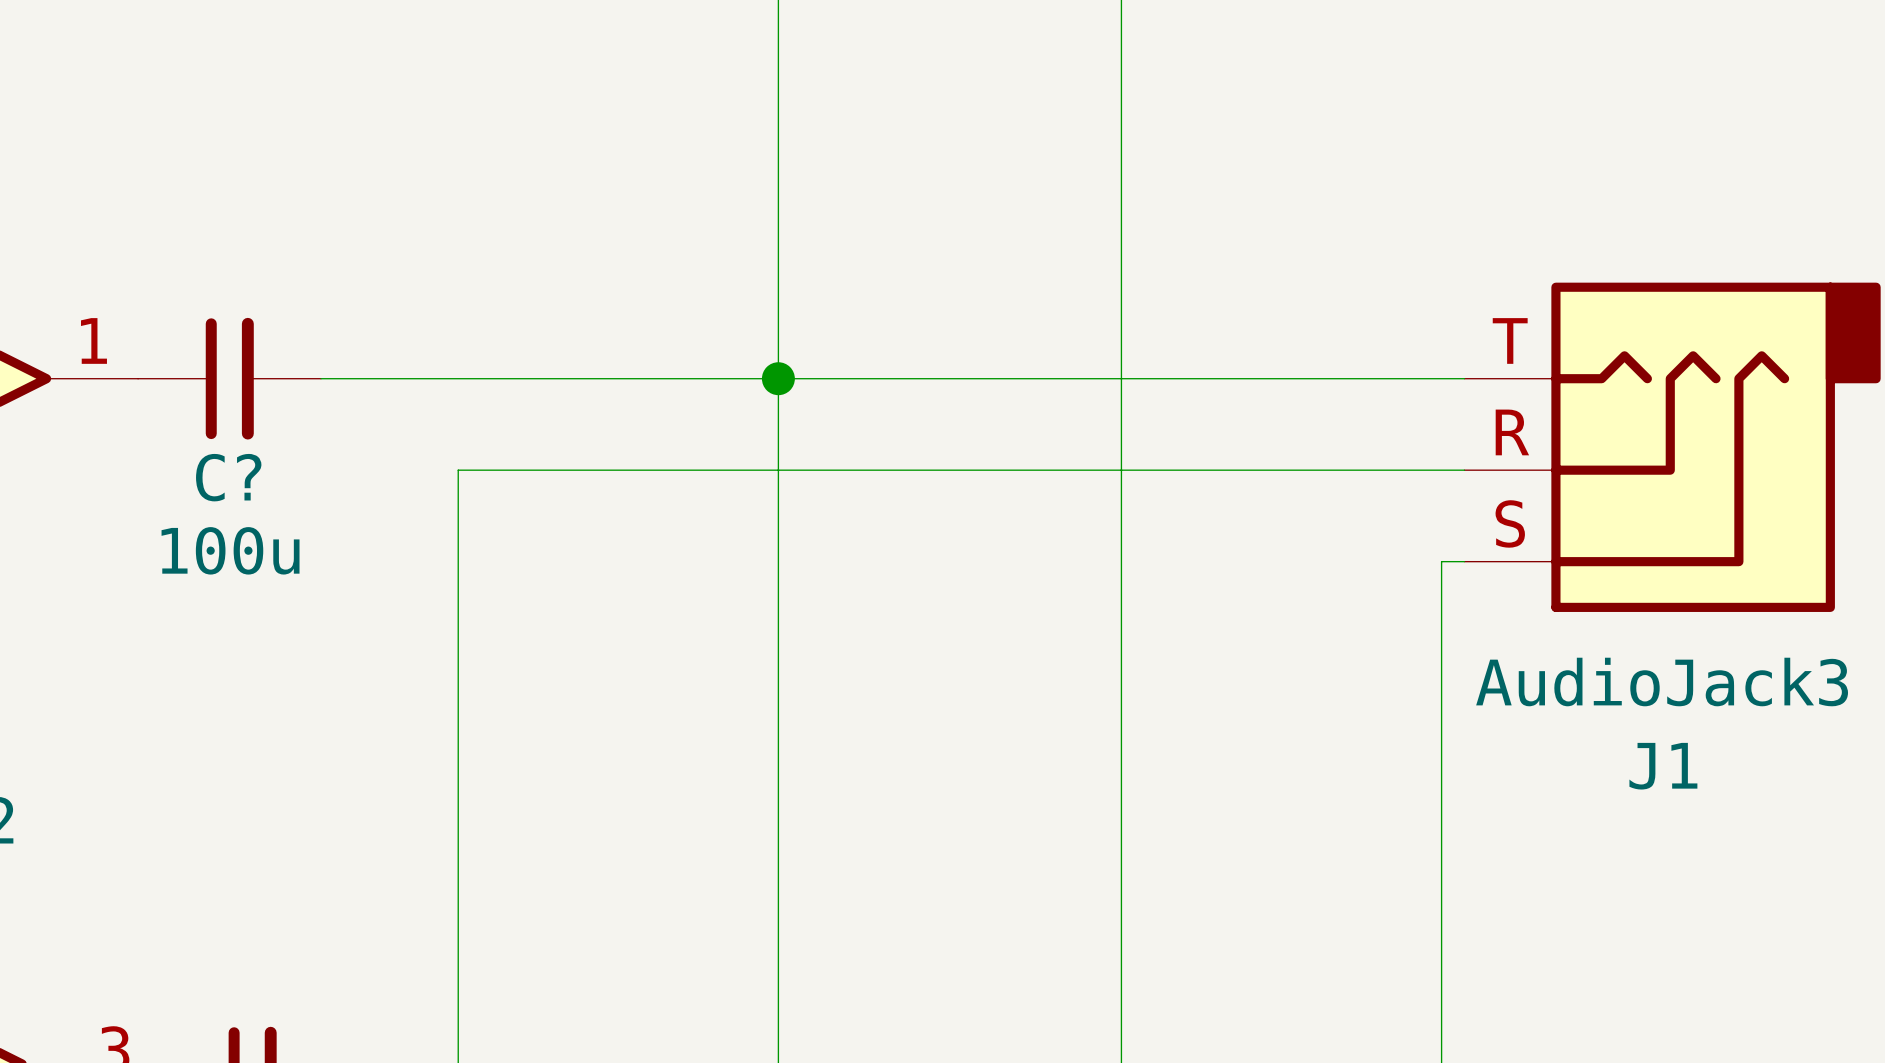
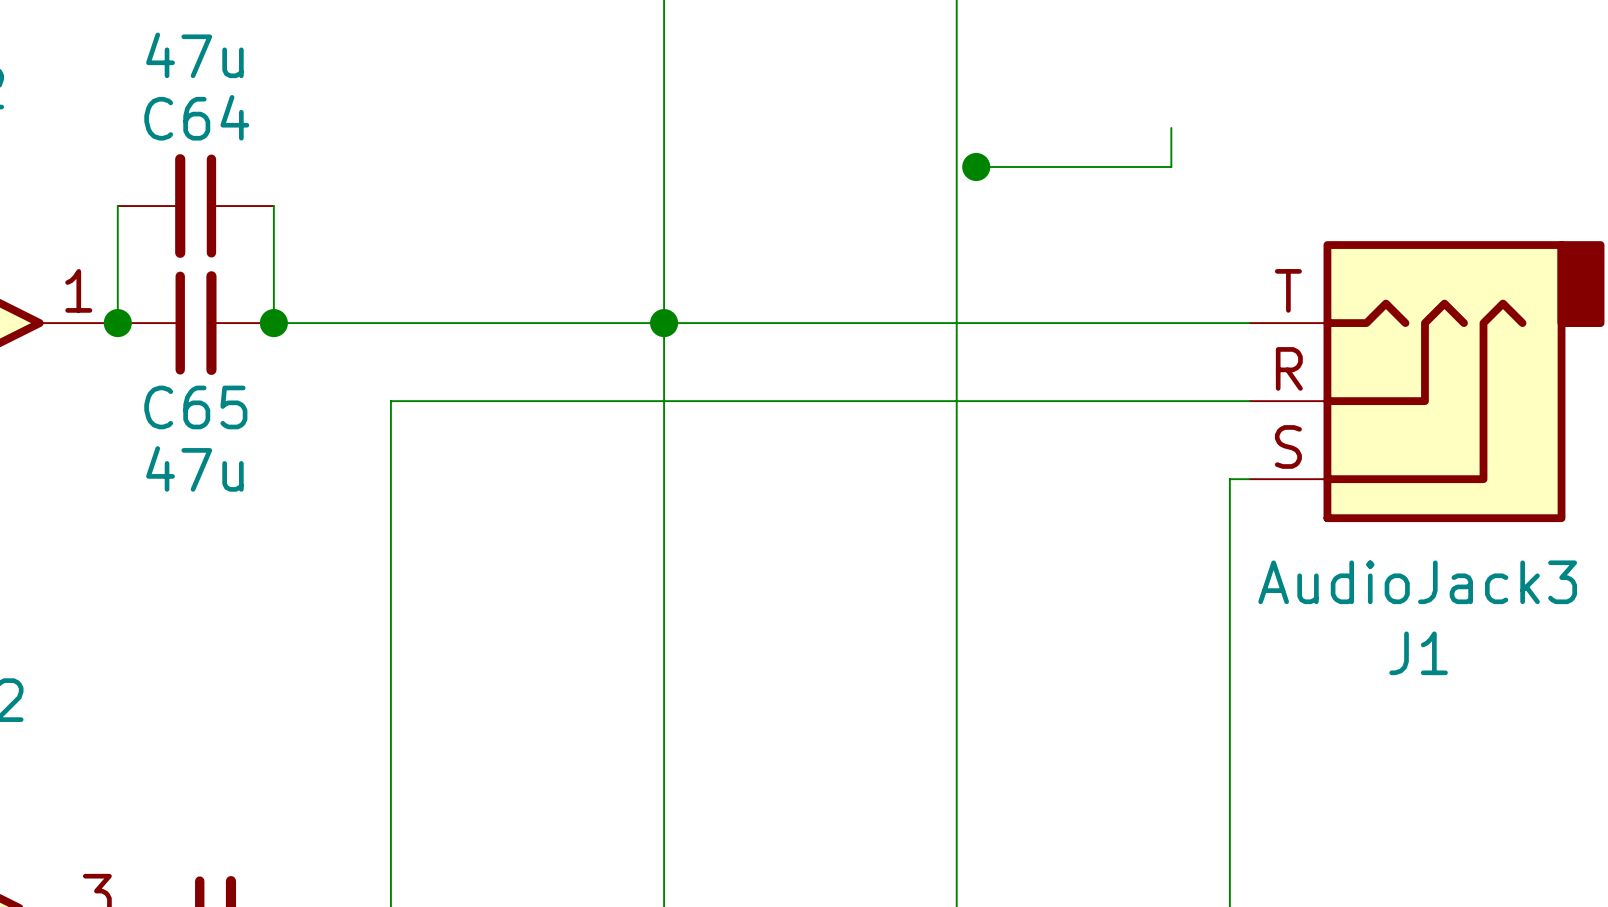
wire: none -> (1171, 127) (1171, 167) (976, 167)
junction: none -> (976, 167)
wire: none -> (117, 206) (117, 323)
C64: none -> 47u (195, 206)
wire: none -> (273, 206) (273, 323)
junction: none -> (117, 323)
junction: none -> (273, 323)
C? name: C? (228, 477) -> C65 (195, 407)
C? value: 100u (230, 550) -> 47u (194, 468)

